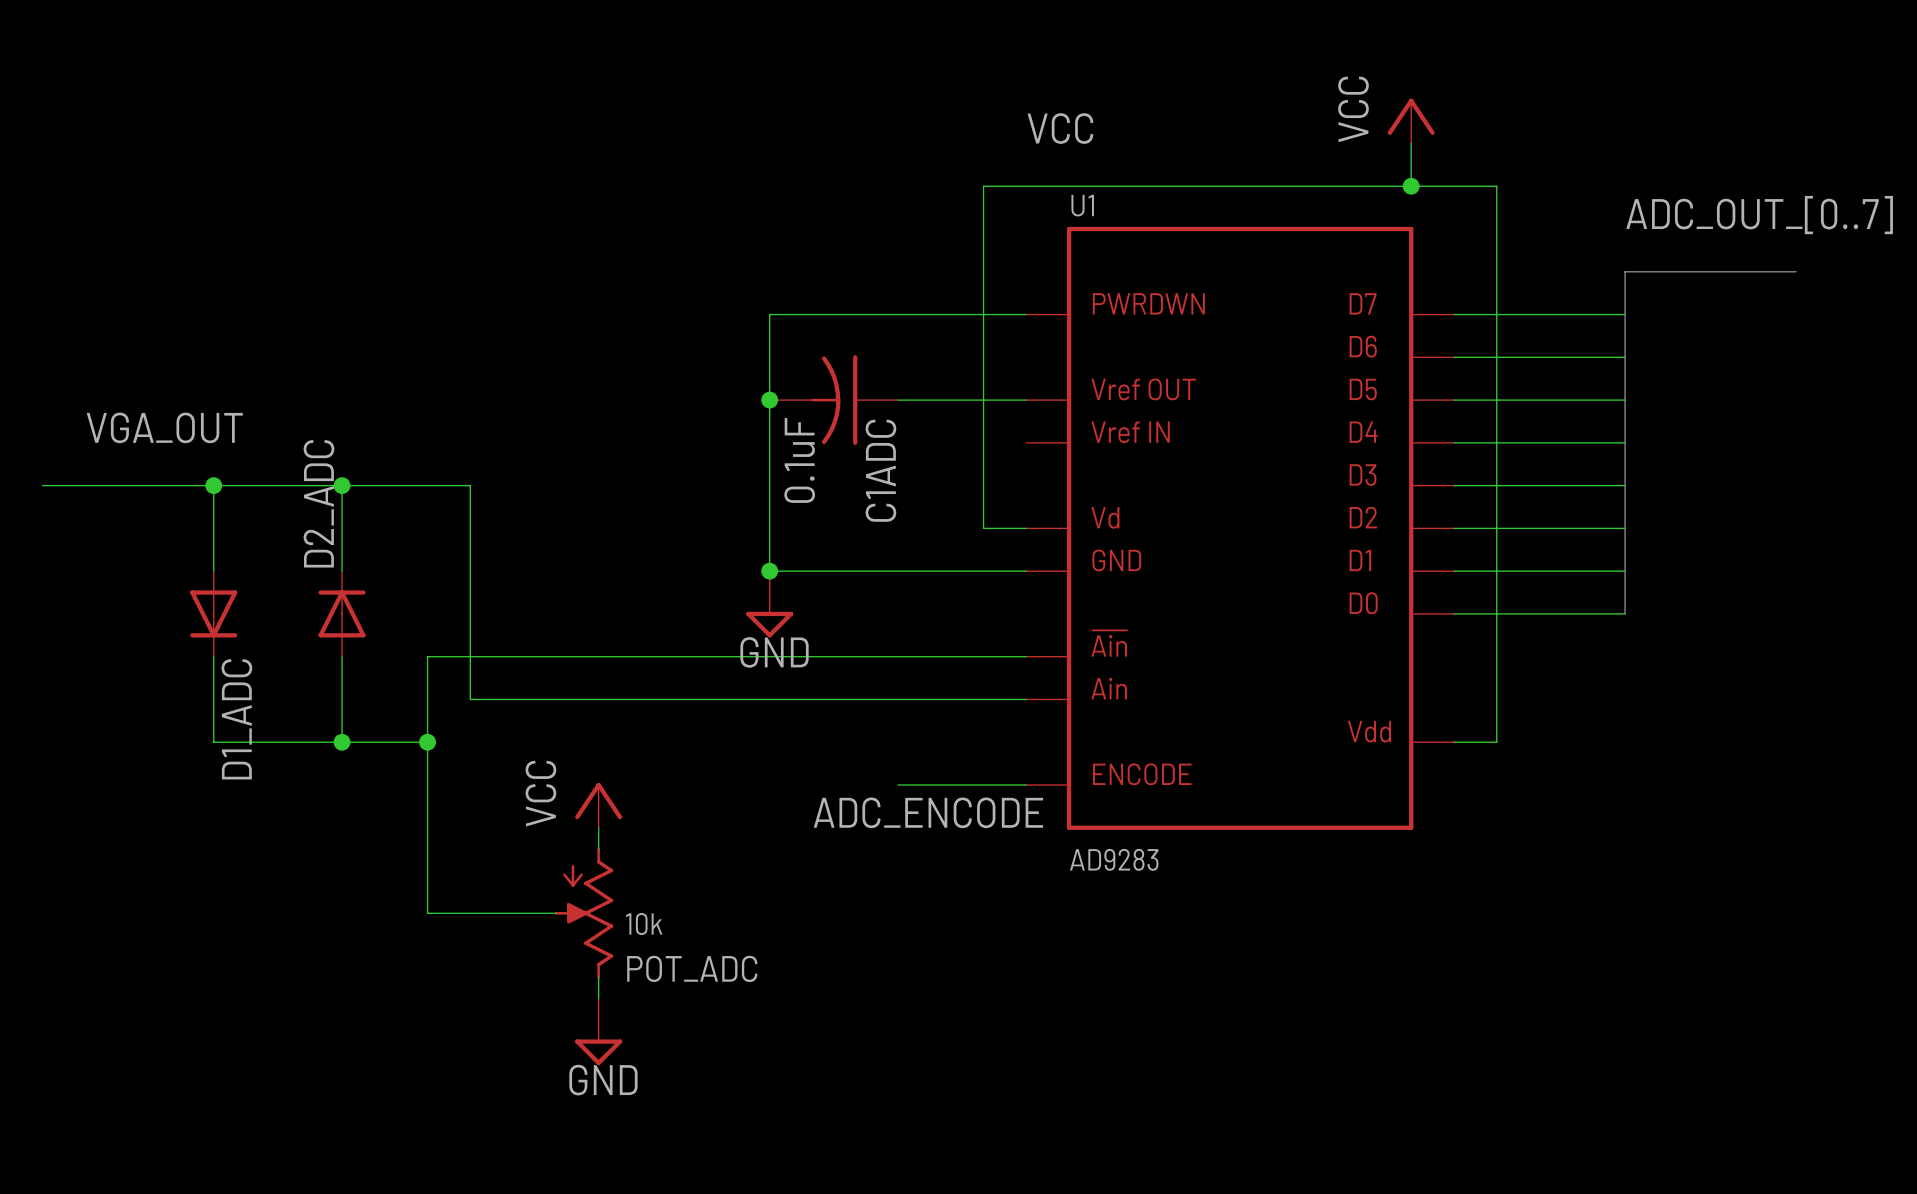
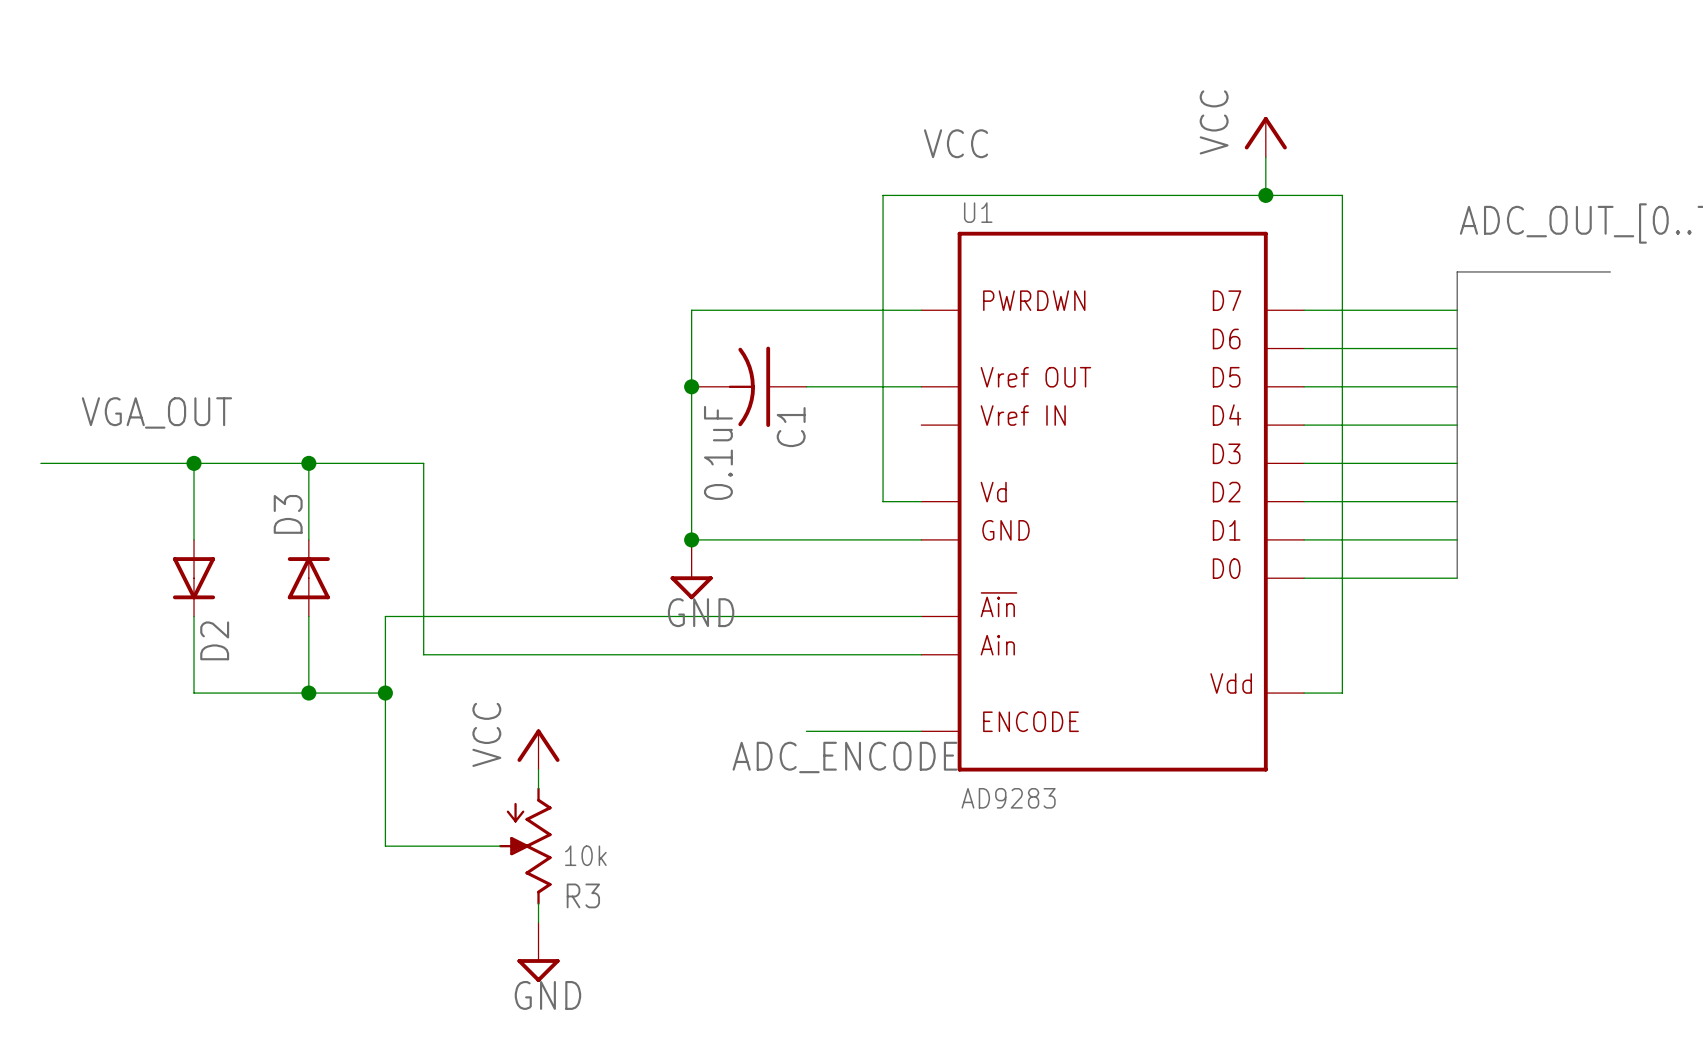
C1ADC name: C1ADC (880, 470) -> C1 (791, 427)
D2_ADC name: D2_ADC (318, 503) -> D3 (288, 514)
D1_ADC name: D1_ADC (236, 719) -> D2 (214, 640)
POT_ADC name: POT_ADC (692, 968) -> R3 (583, 895)

